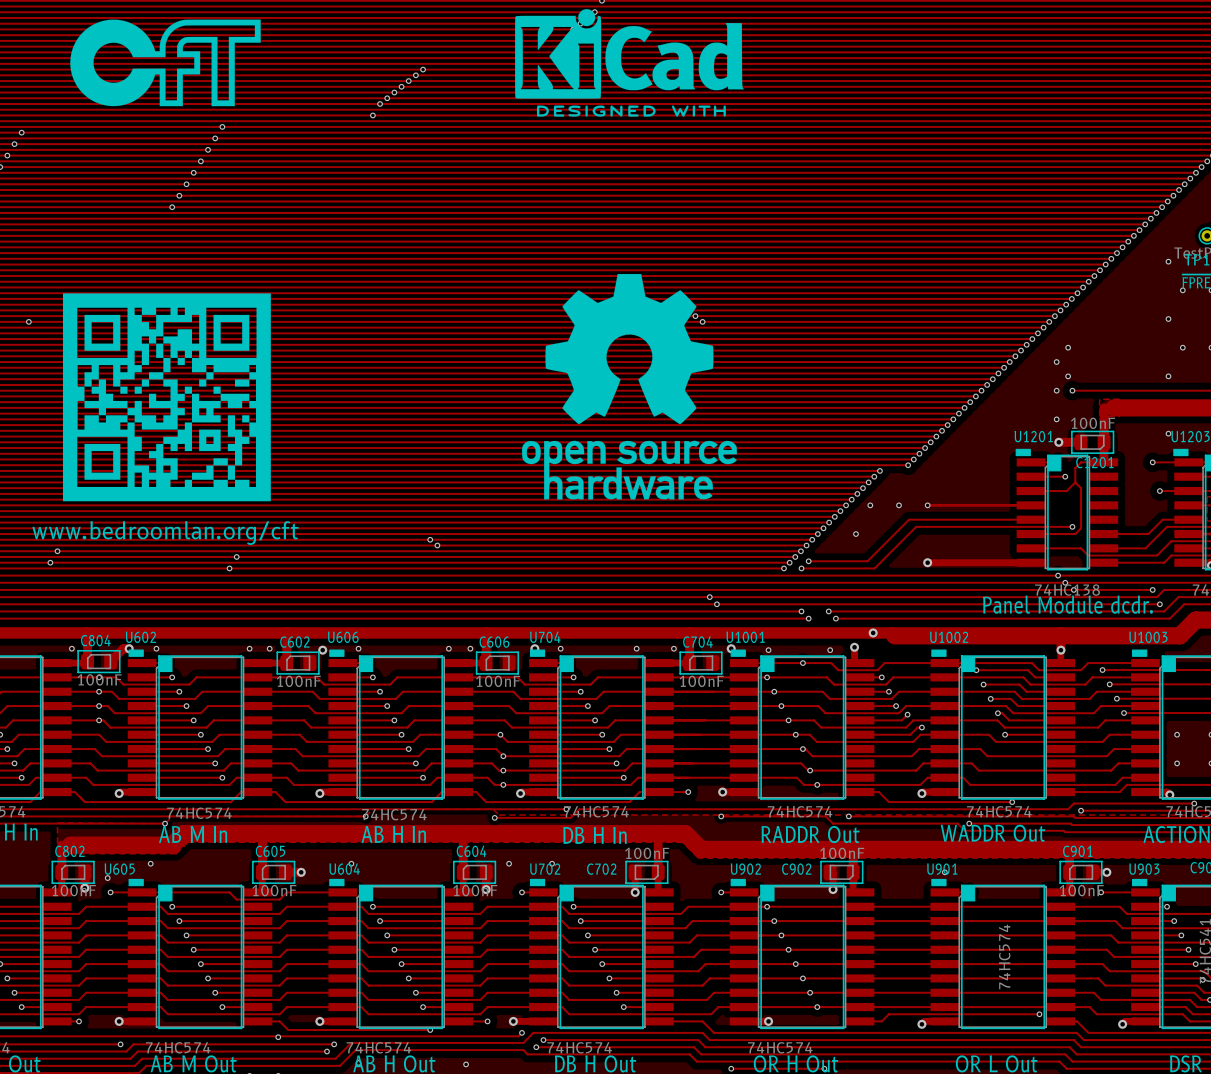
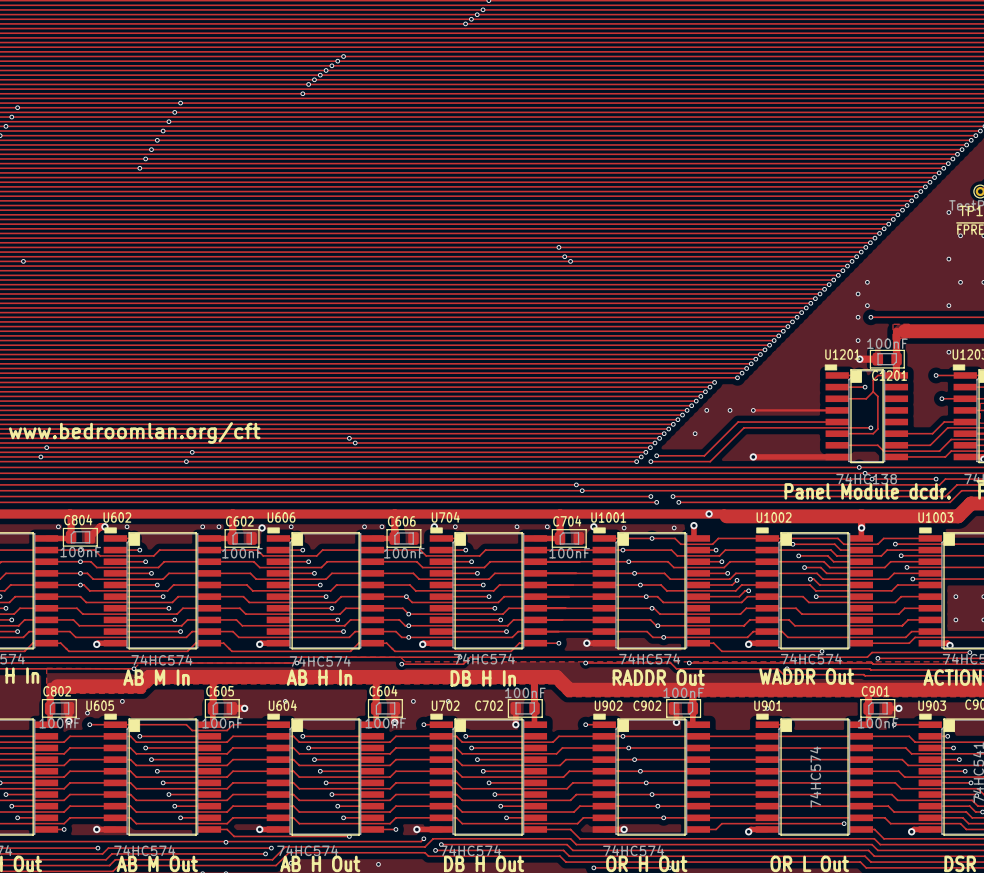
drawing: [515, 9, 744, 117] -> none
drawing: [70, 19, 261, 107] -> none
drawing: [522, 273, 737, 500] -> none
drawing: [62, 293, 271, 502] -> none

